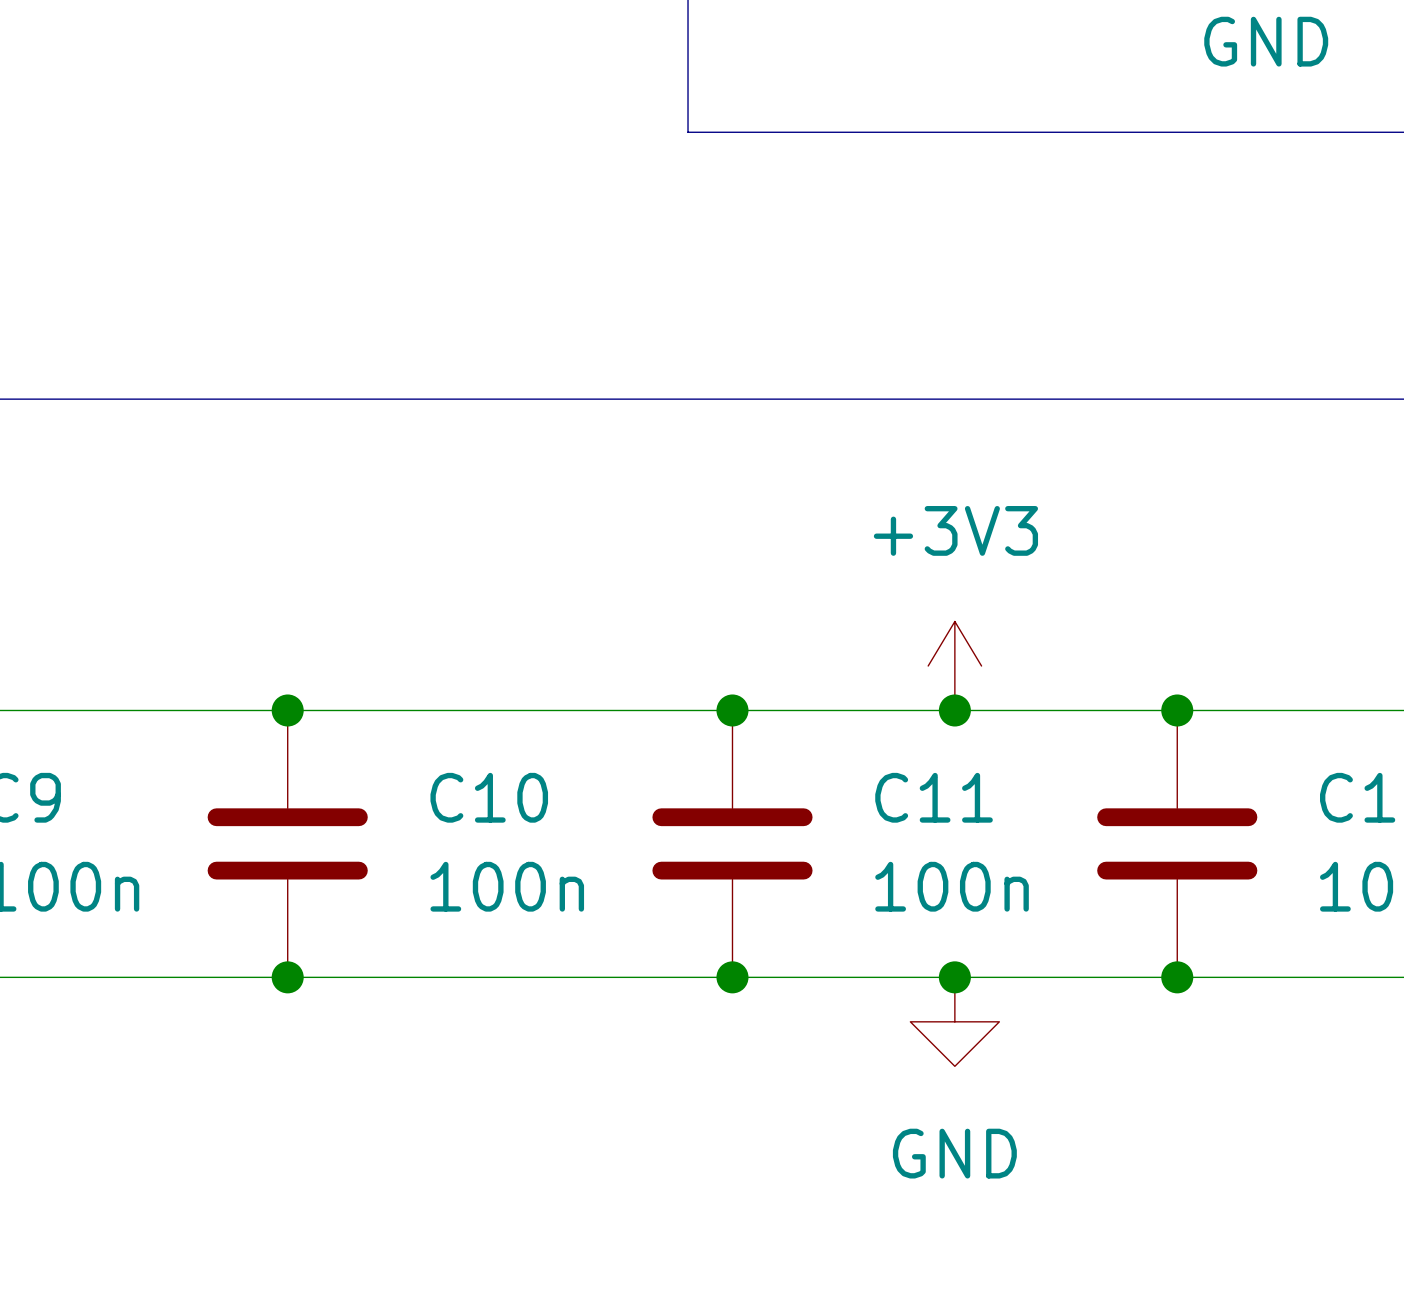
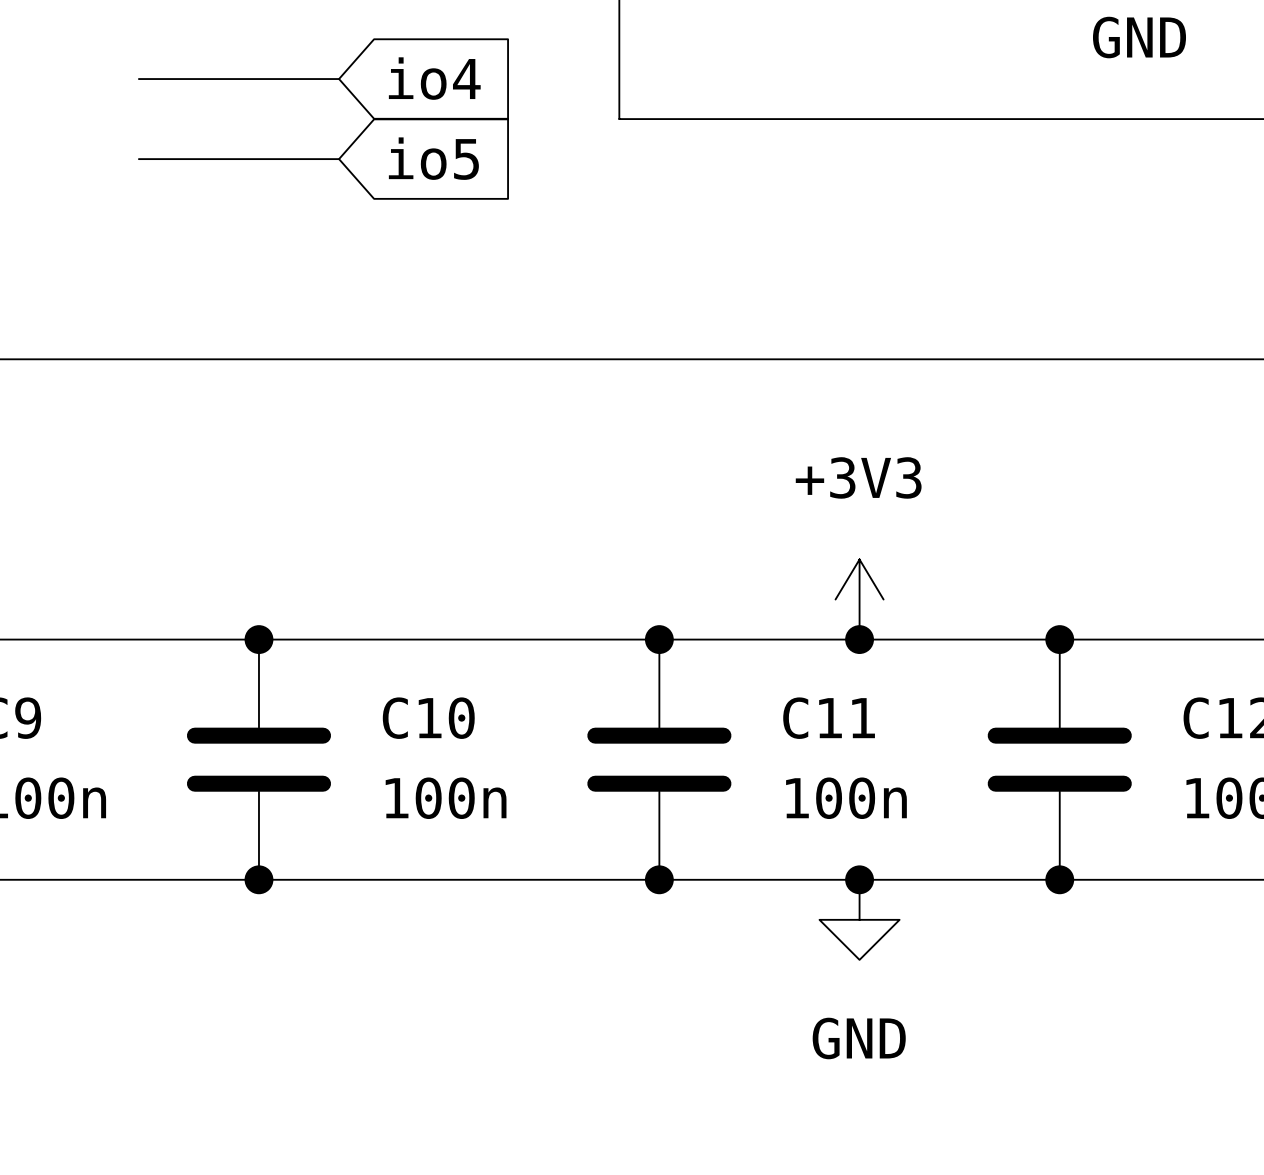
global label: none -> io4 (434, 78)
wire: none -> (138, 79) (339, 79)
wire: none -> (138, 159) (339, 159)
global label: none -> io5 (433, 158)

